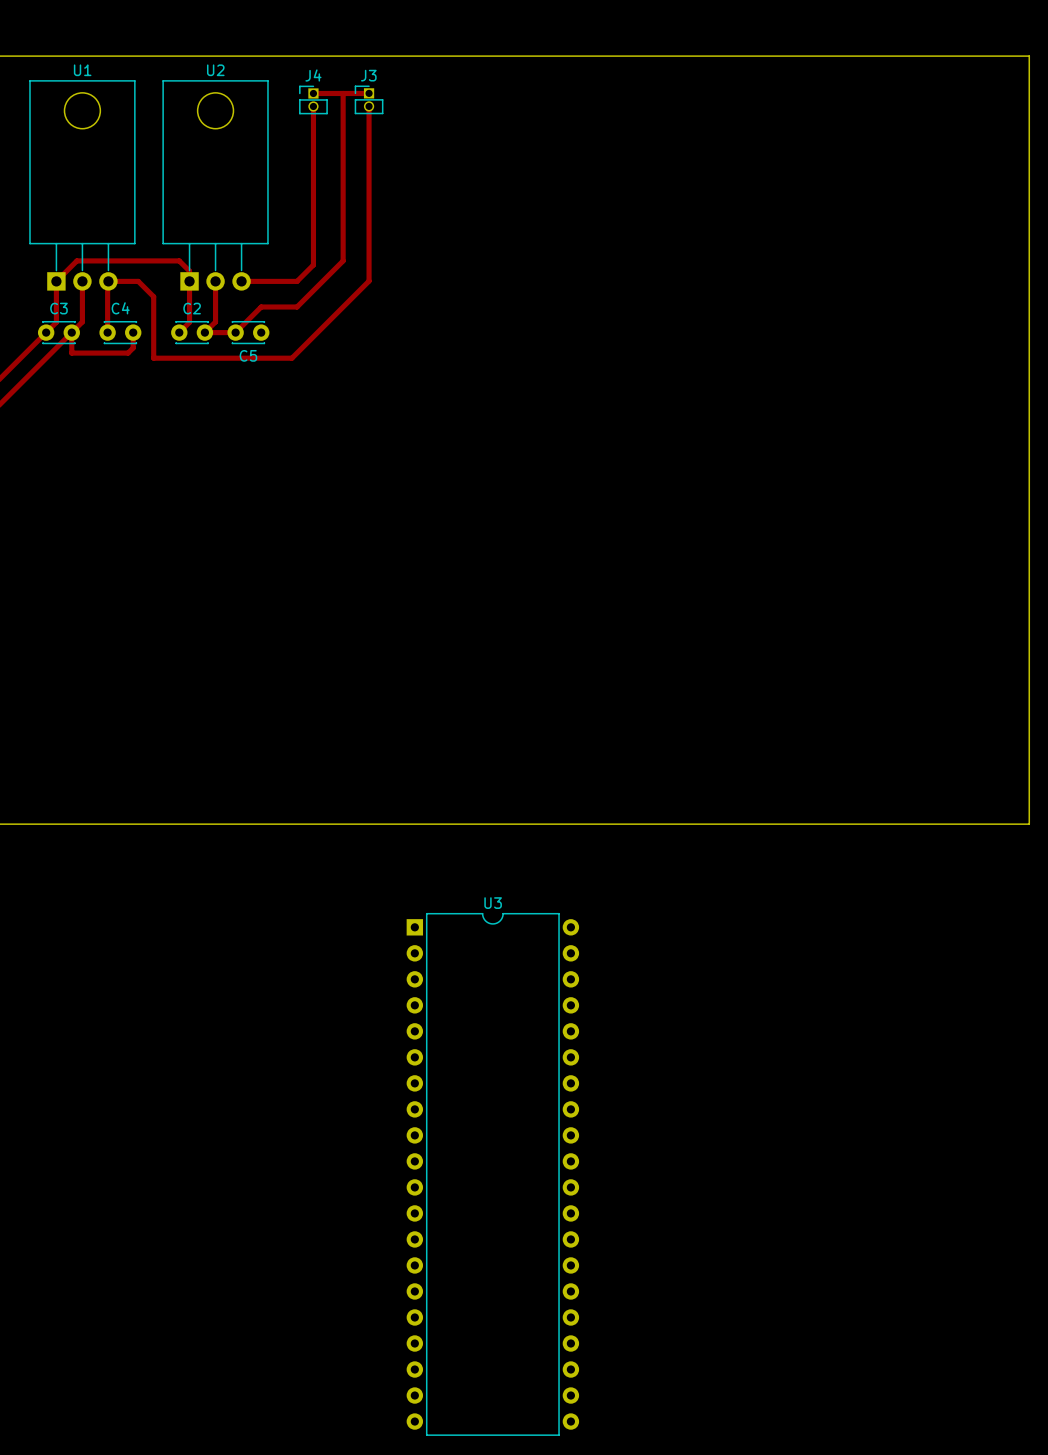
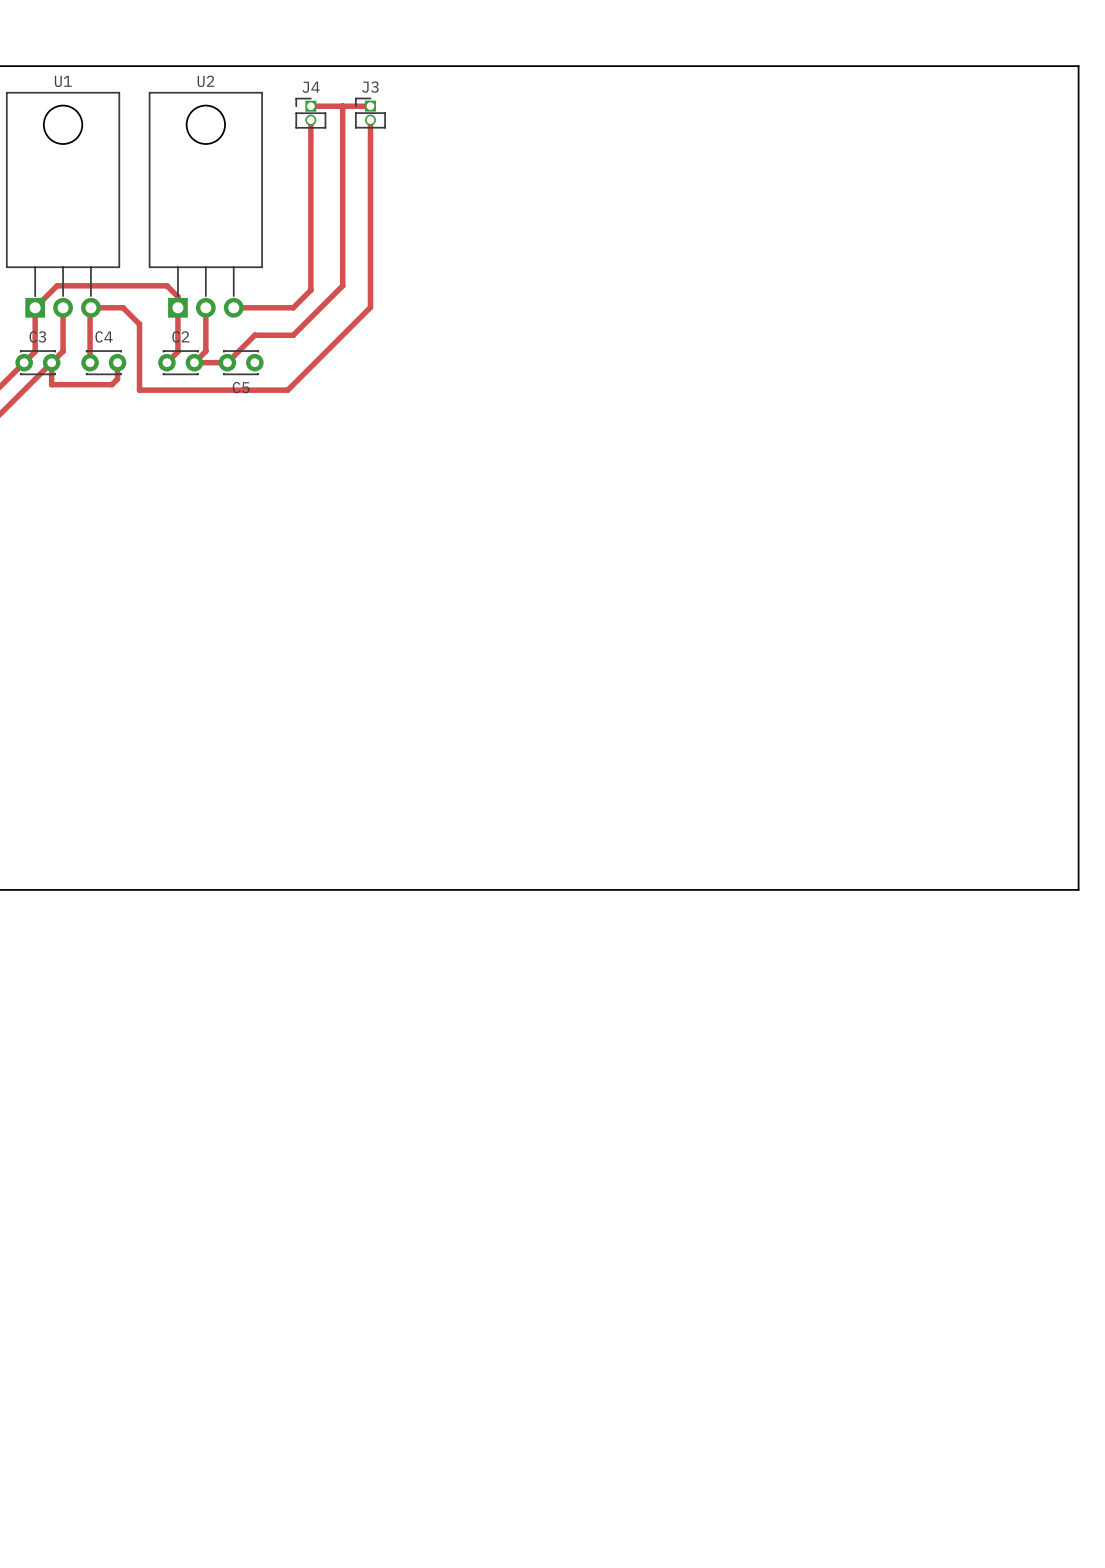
U3: (492, 1174) -> none

